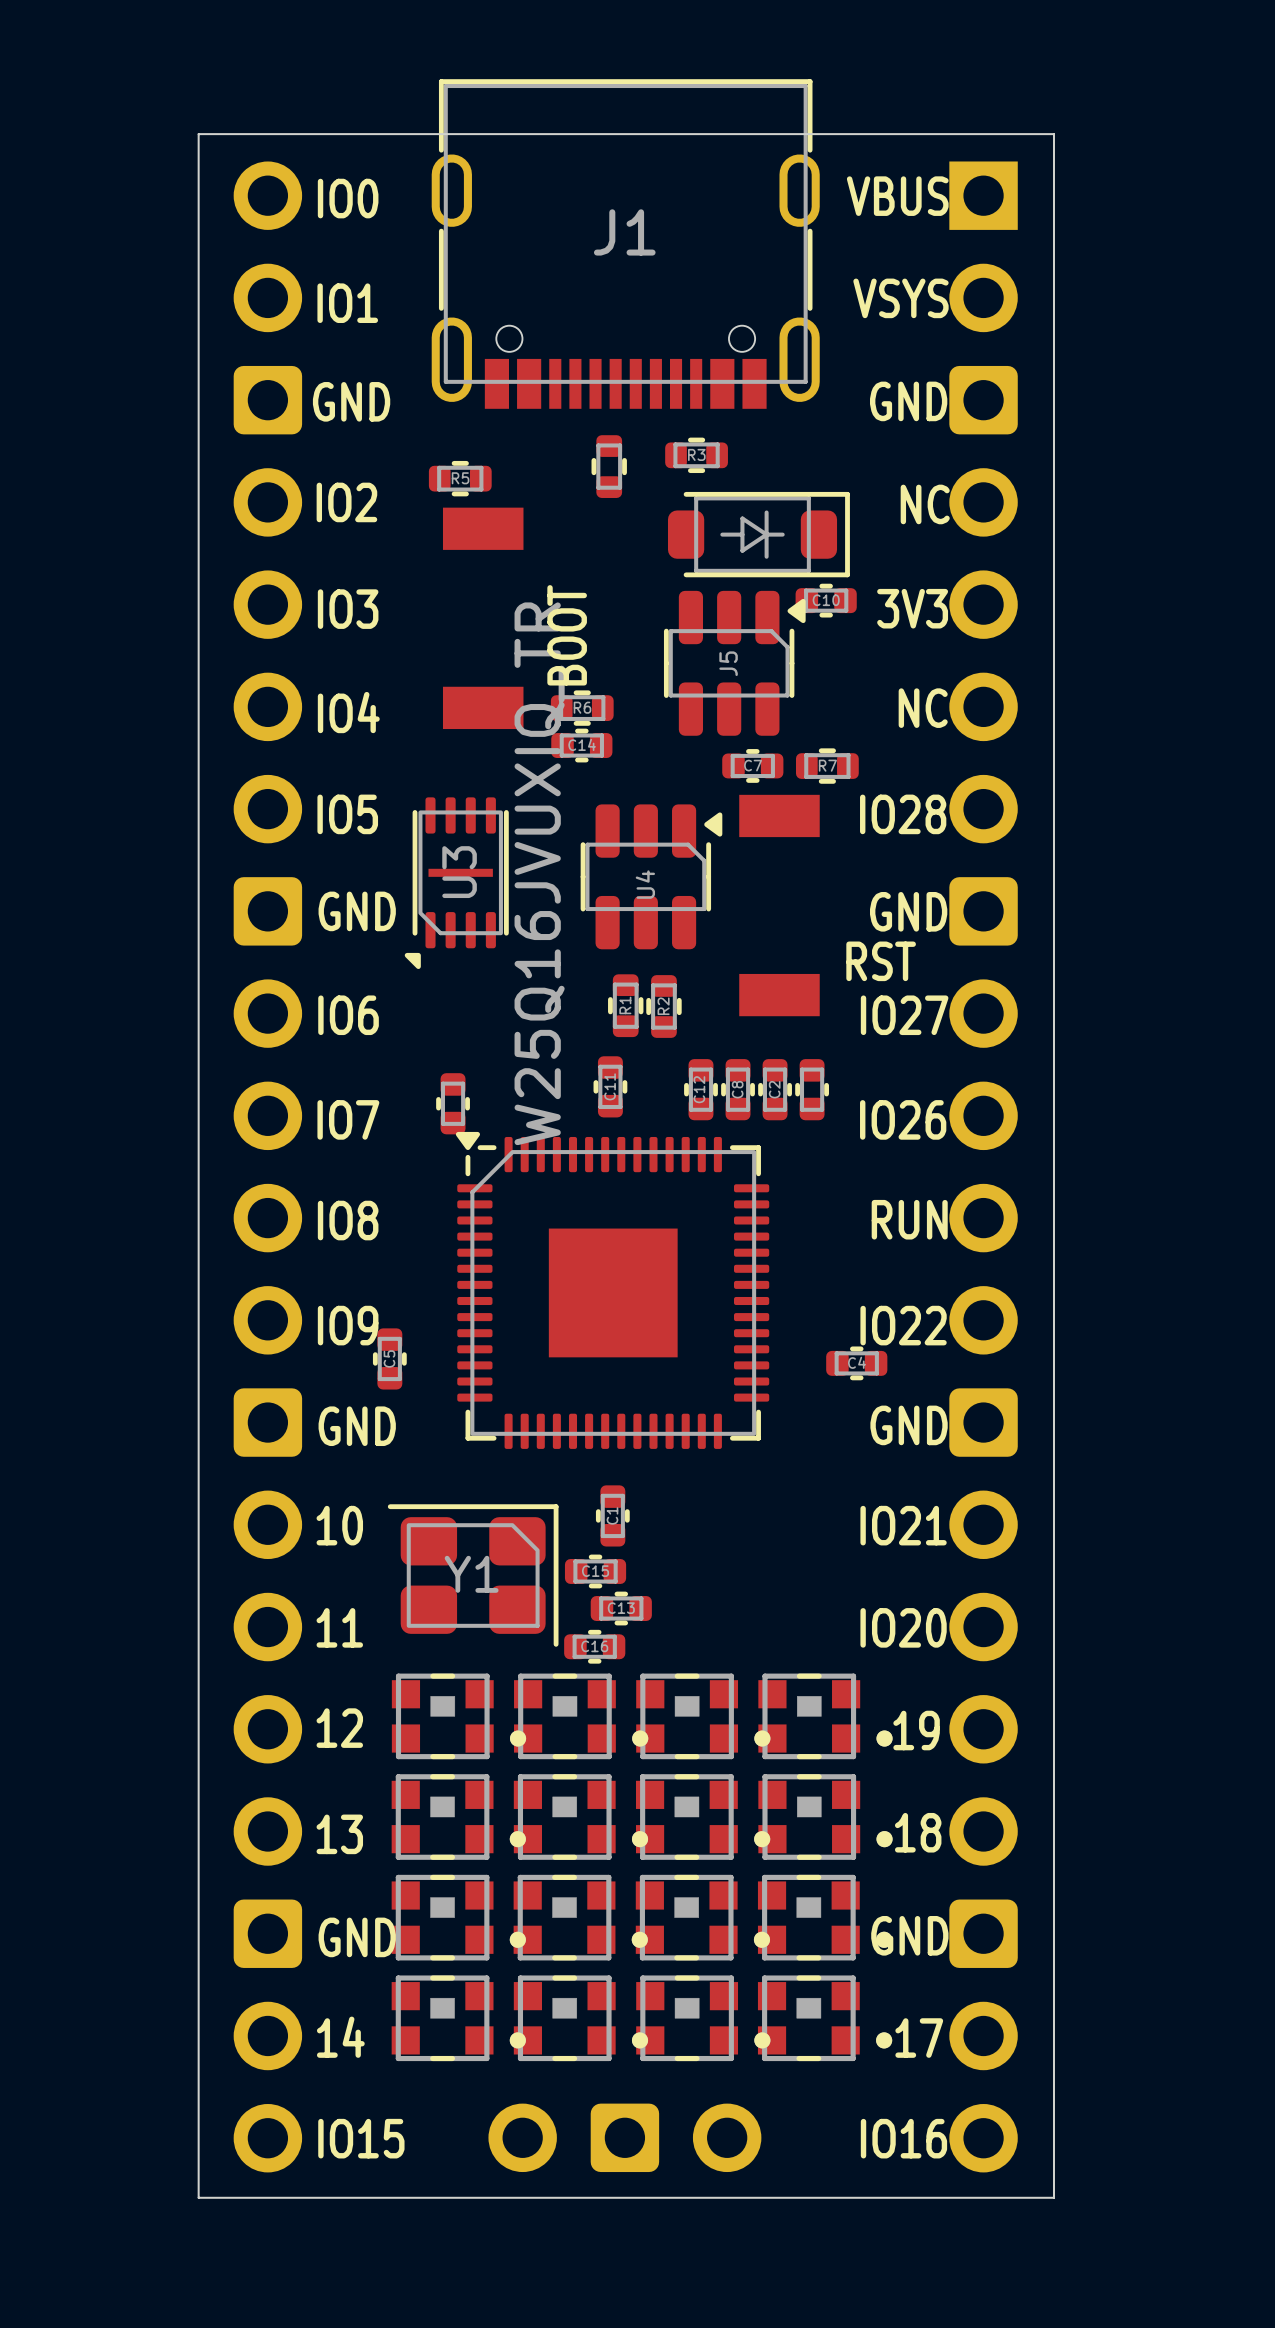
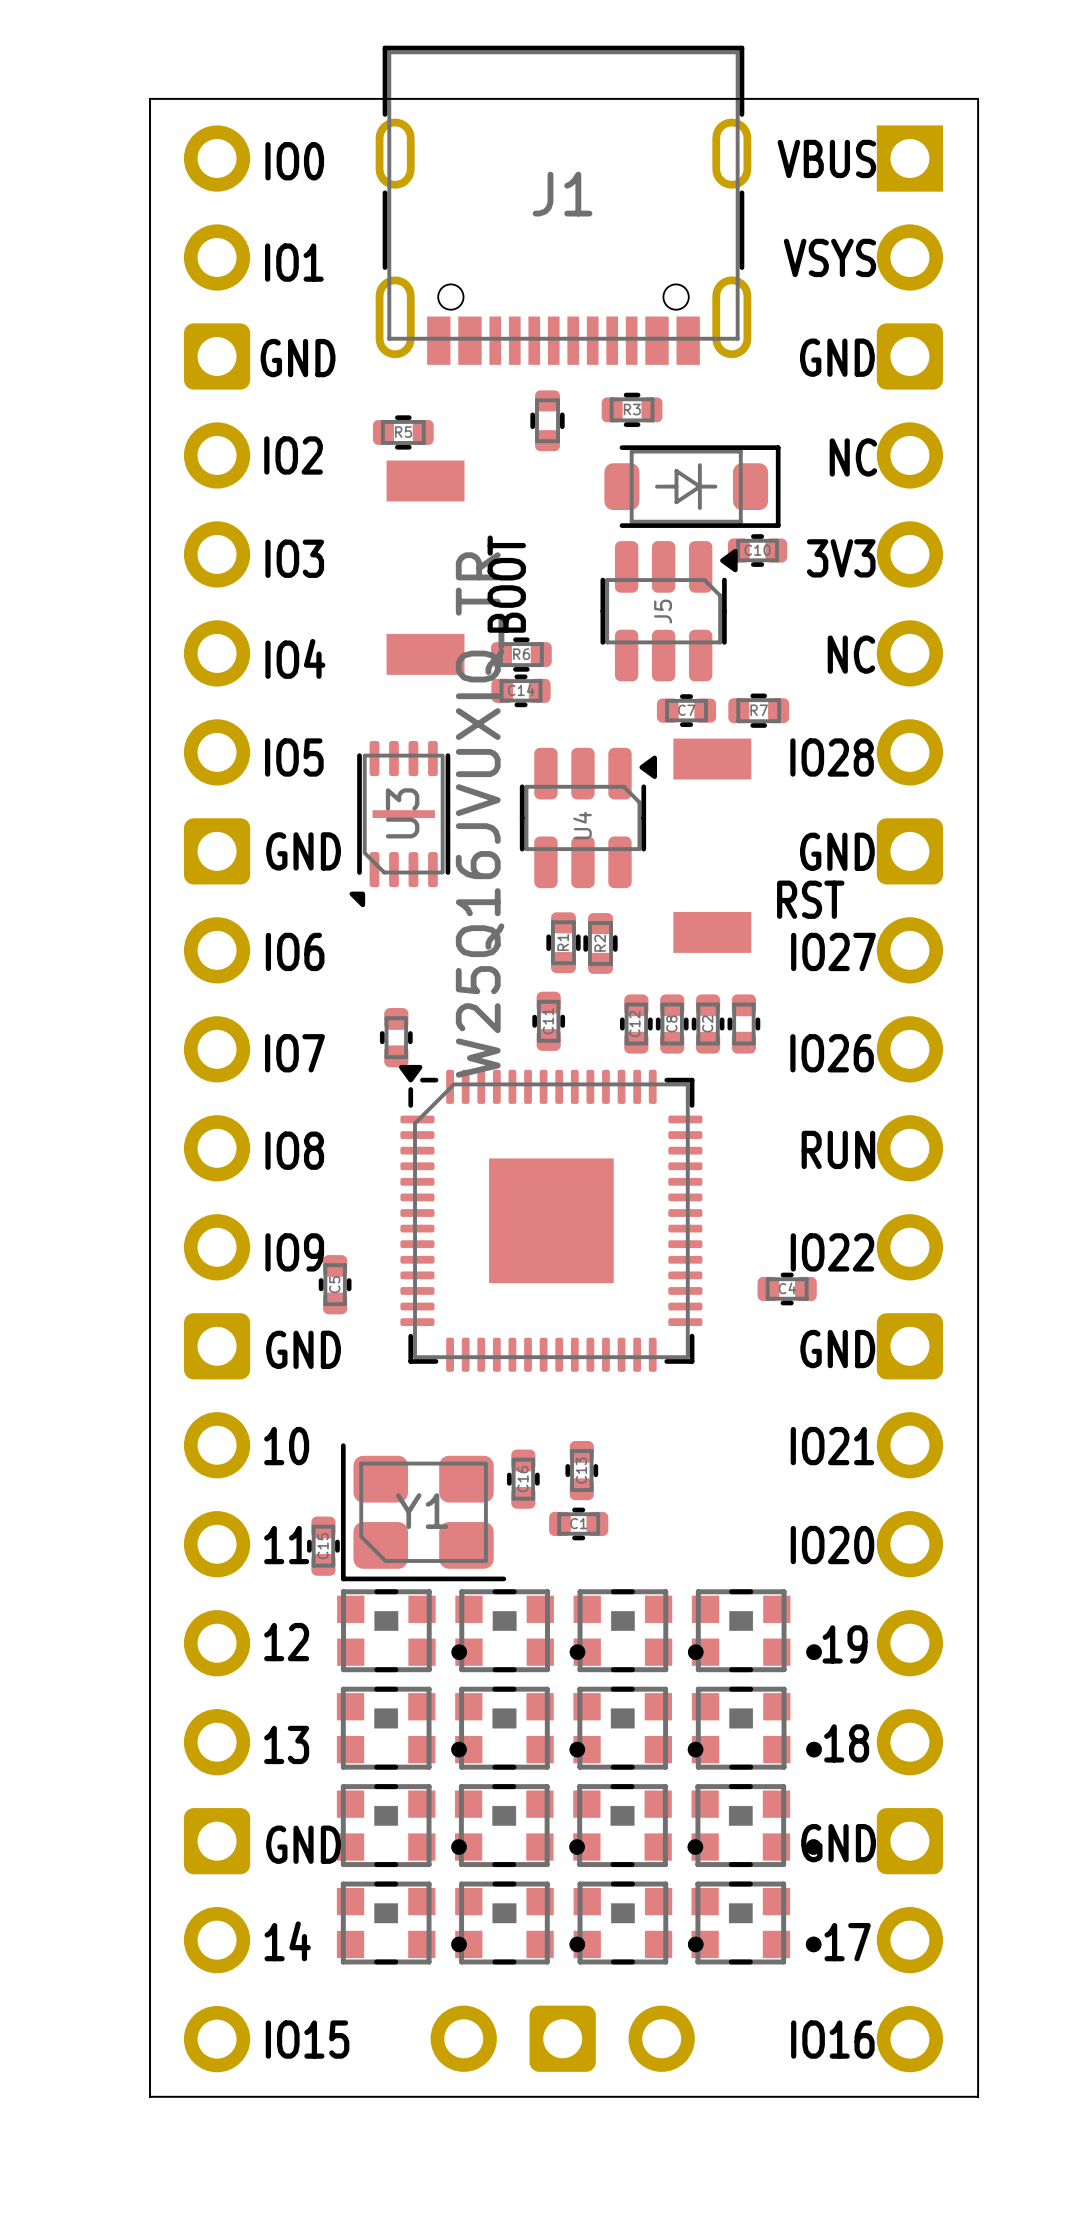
C1 rotation: 0° (612, 1515) -> 90° clockwise (578, 1523)
C1 position: (612, 1515) -> (578, 1523)
C15 rotation: 0° (595, 1571) -> 90° clockwise (323, 1546)
C15 position: (595, 1571) -> (323, 1546)
Y1 rotation: 0° (473, 1575) -> 180° (423, 1512)
C13 rotation: 0° (621, 1608) -> 90° clockwise (581, 1470)
C13 position: (621, 1608) -> (581, 1470)
C16 rotation: 0° (594, 1646) -> 90° clockwise (523, 1479)
C16 position: (594, 1646) -> (523, 1479)

